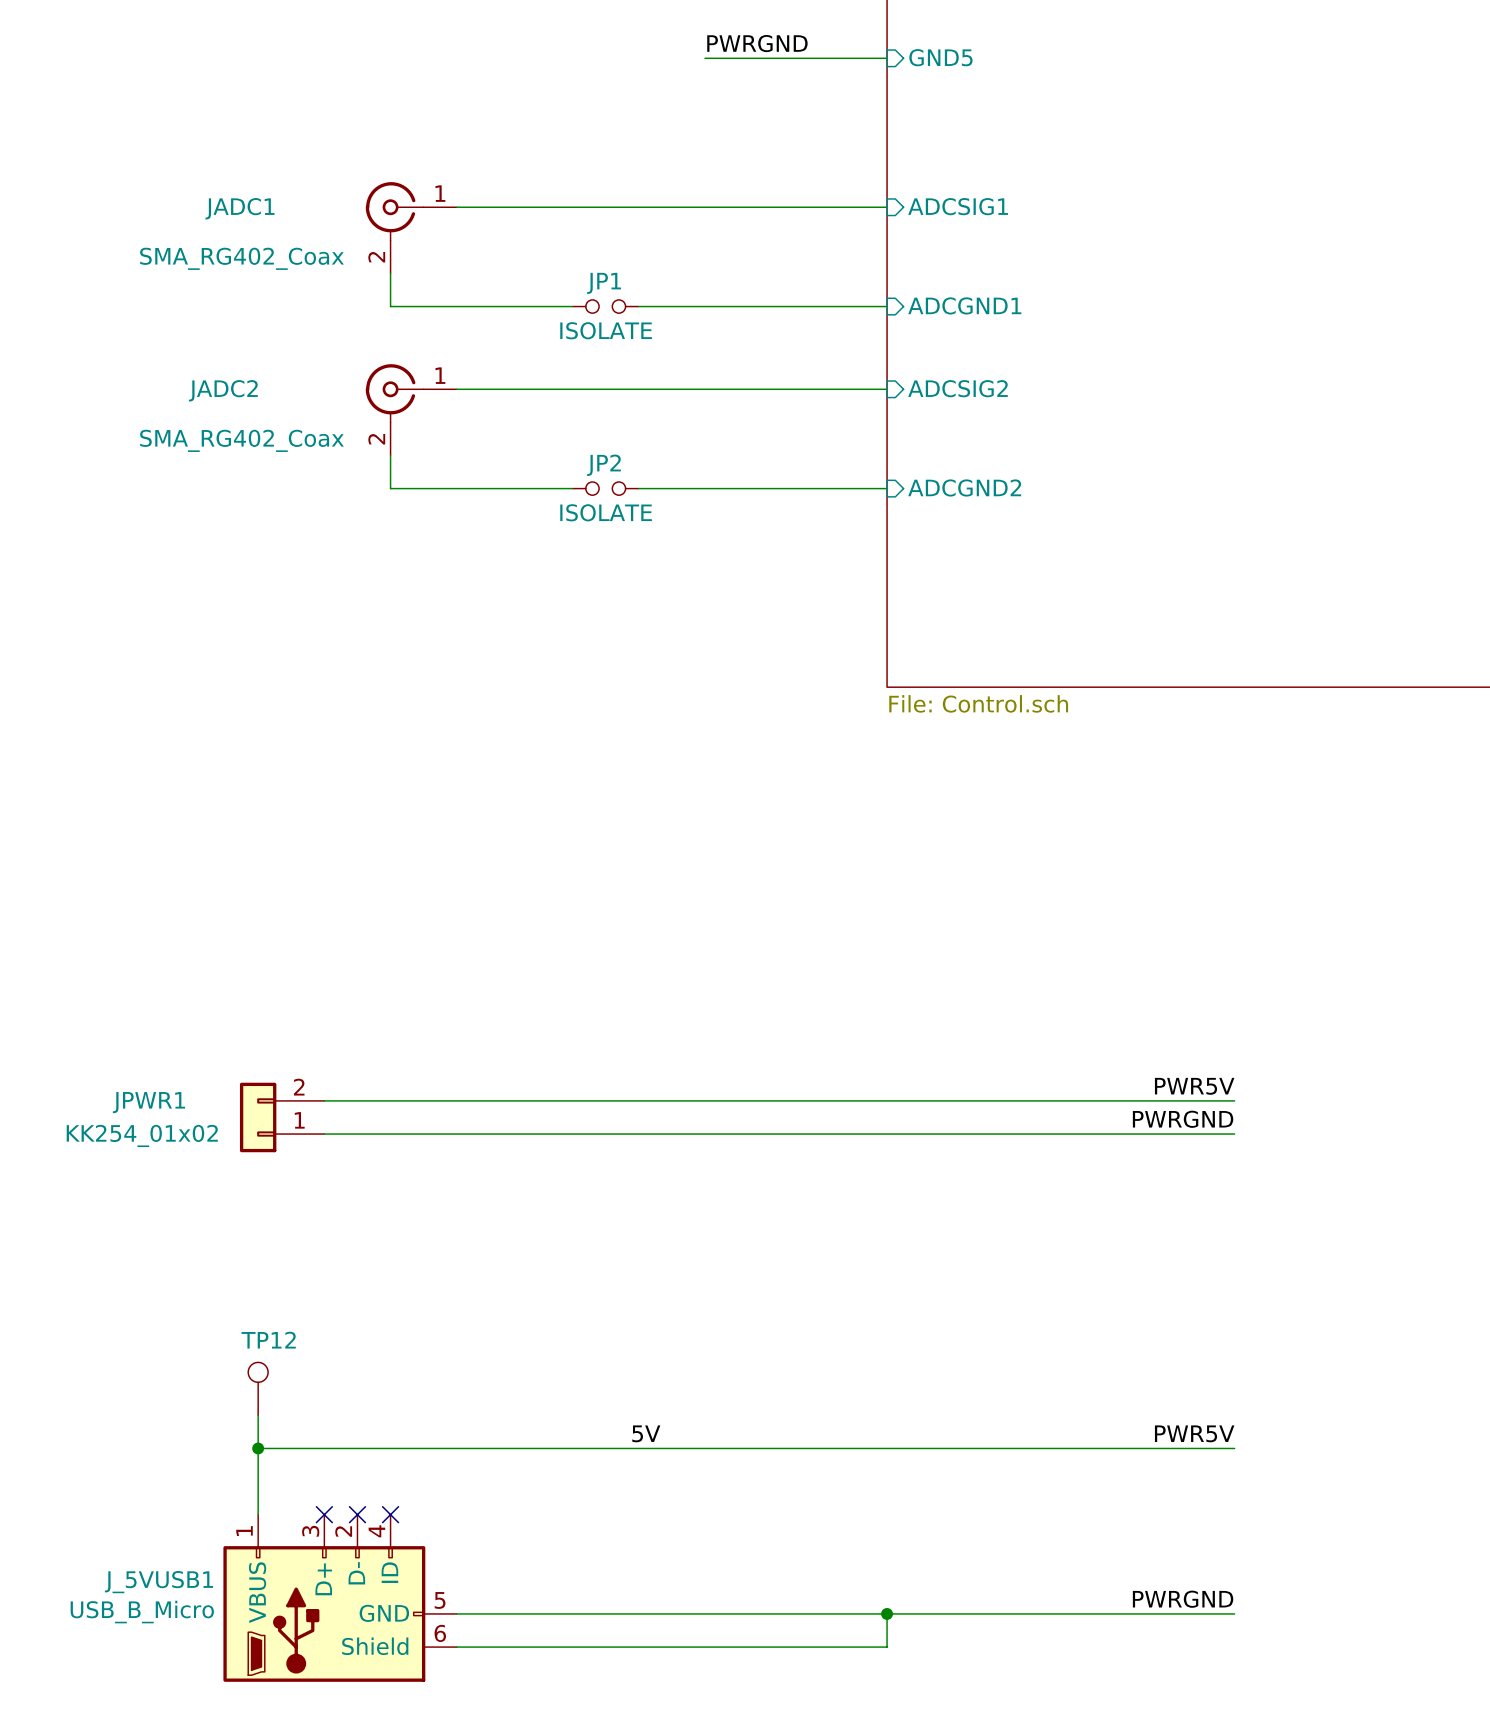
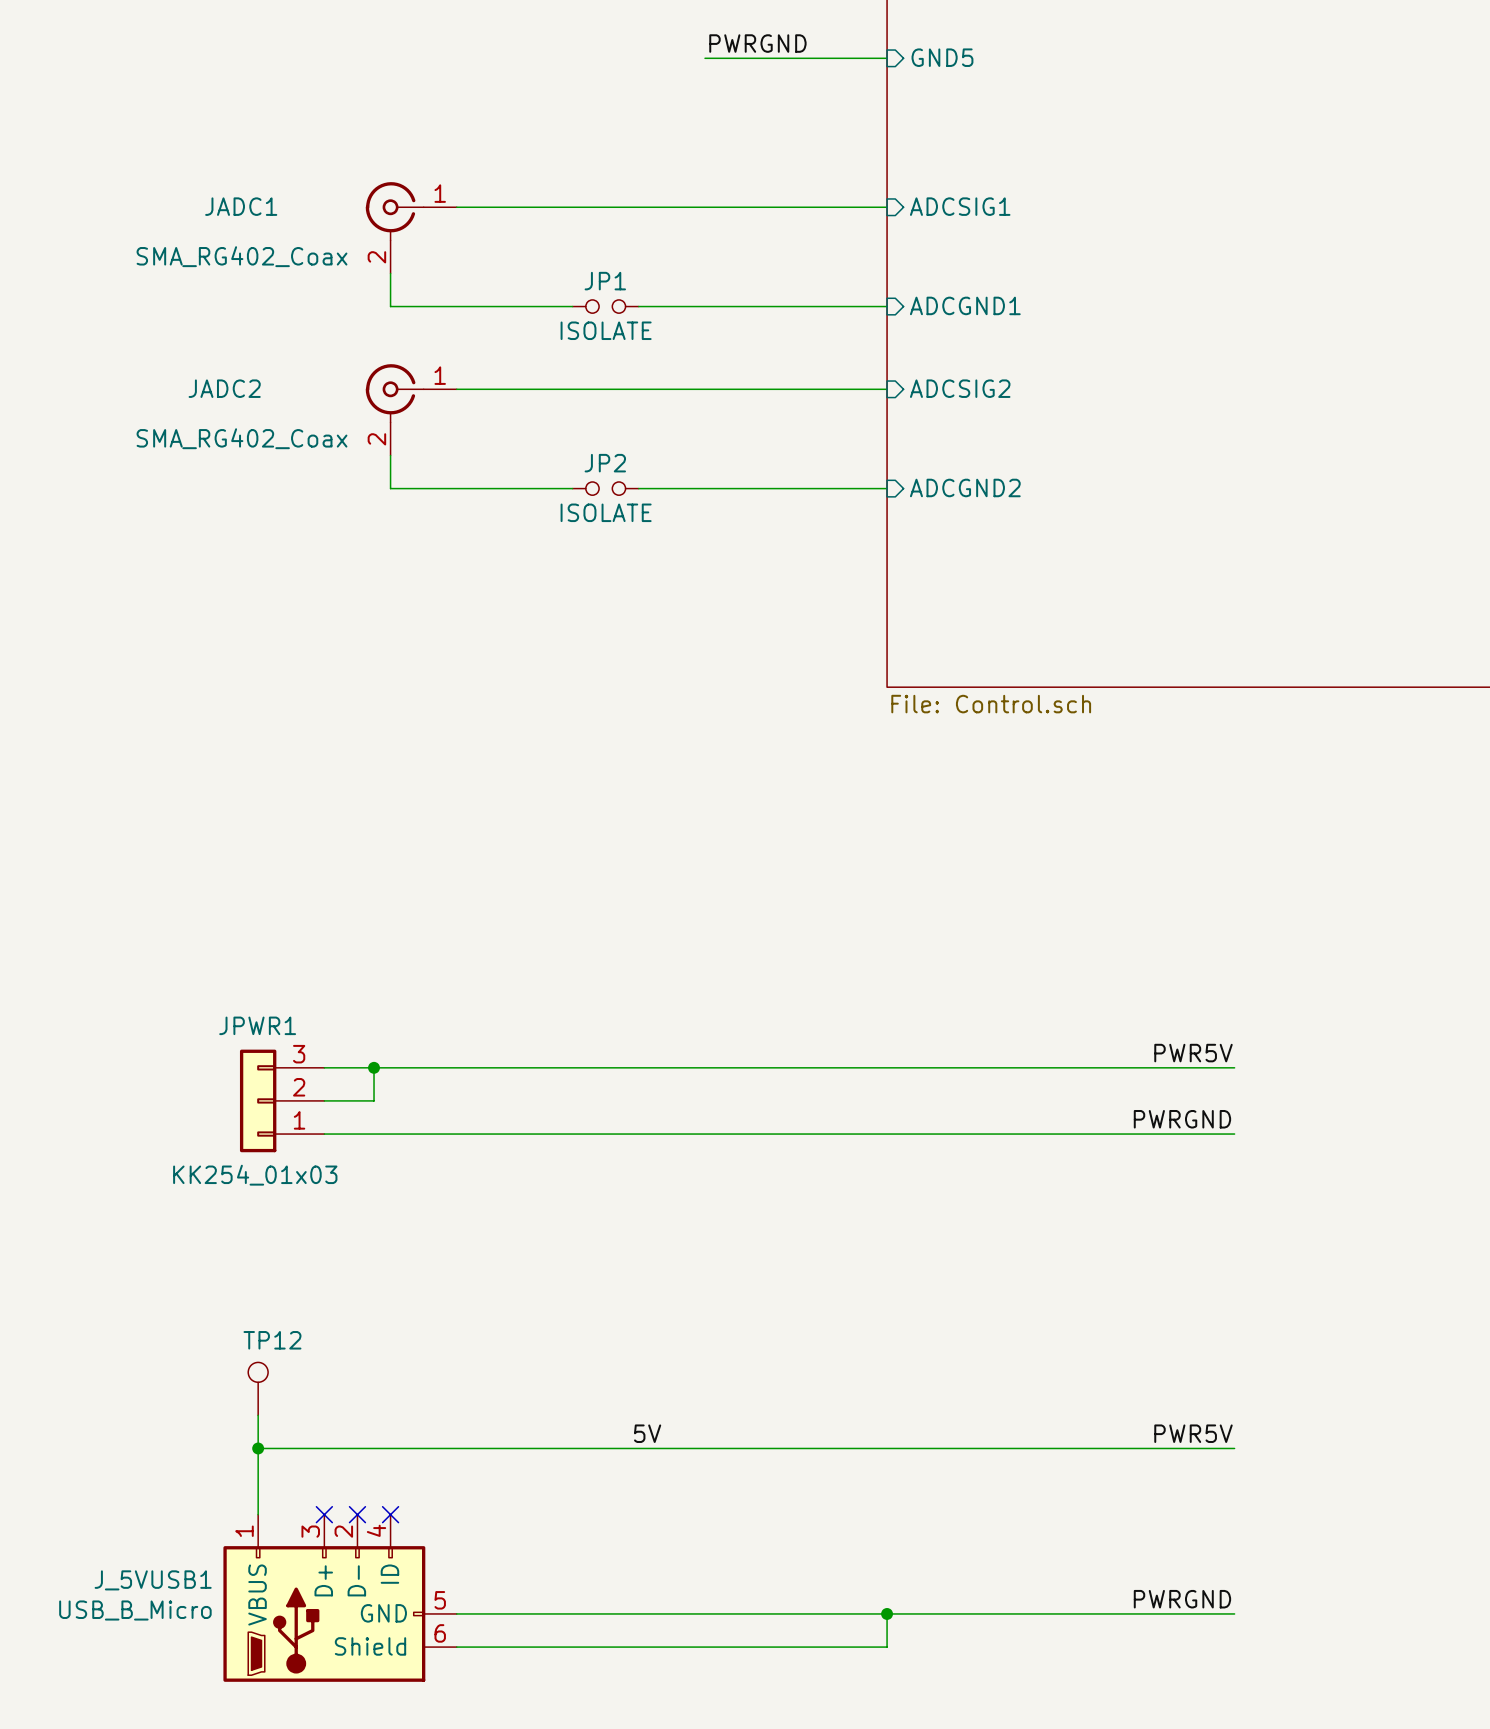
wire: none -> (324, 1067) (1234, 1067)
junction: none -> (374, 1067)
JPWR1 symbol: [239, 1082, 325, 1153] -> [239, 1049, 325, 1153]
label position: PWR5V (1194, 1086) -> PWR5V (1193, 1053)
wire: (374, 1100) (1234, 1100) -> (374, 1100) (374, 1067)
JPWR1 name position: JPWR1 (148, 1102) -> JPWR1 (257, 1025)
JPWR1 value: KK254_01x02 (142, 1135) -> KK254_01x03 (255, 1175)

